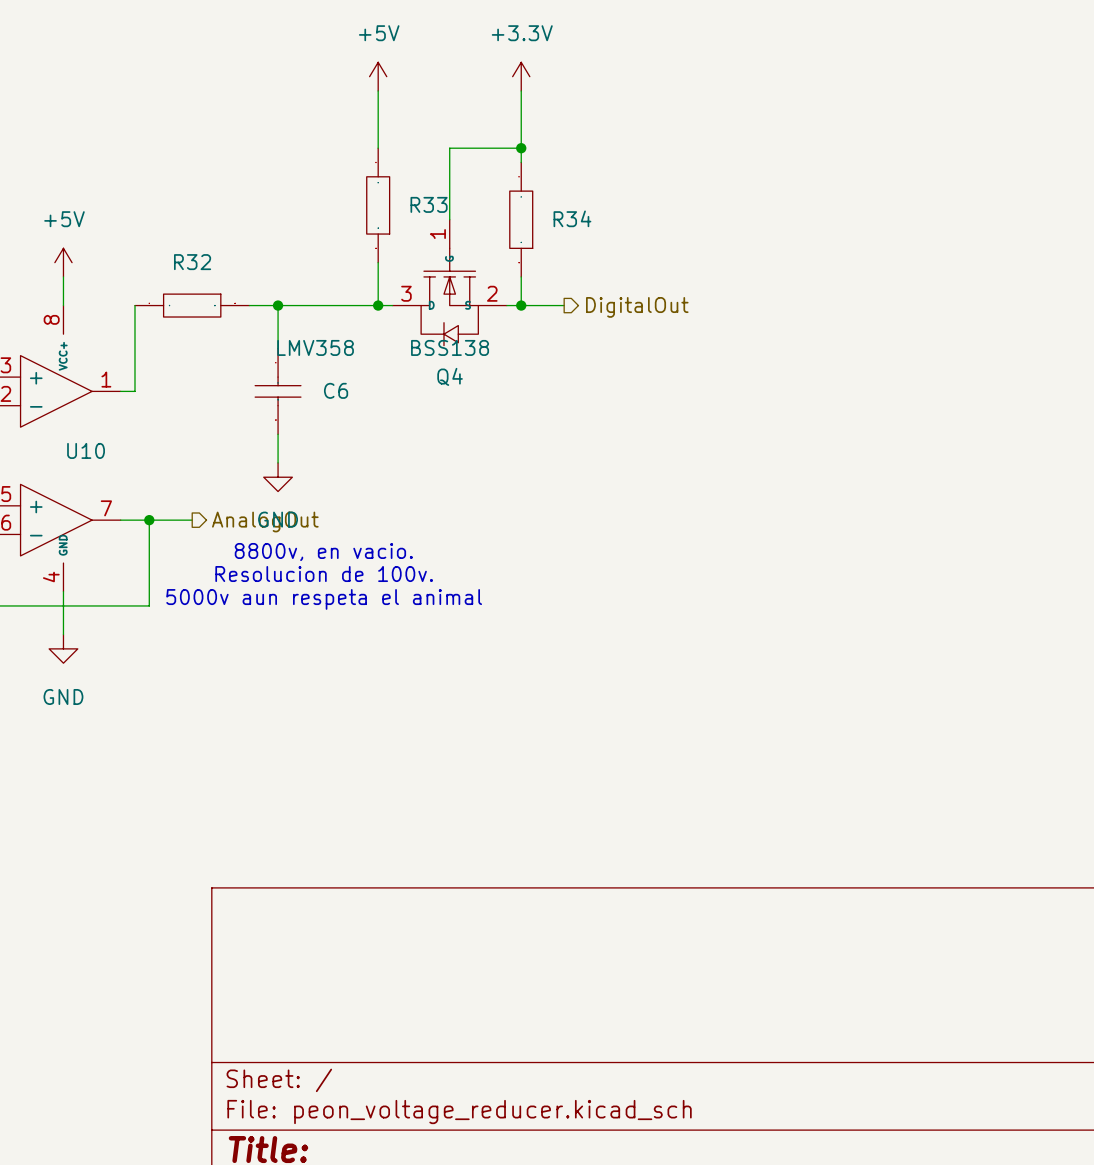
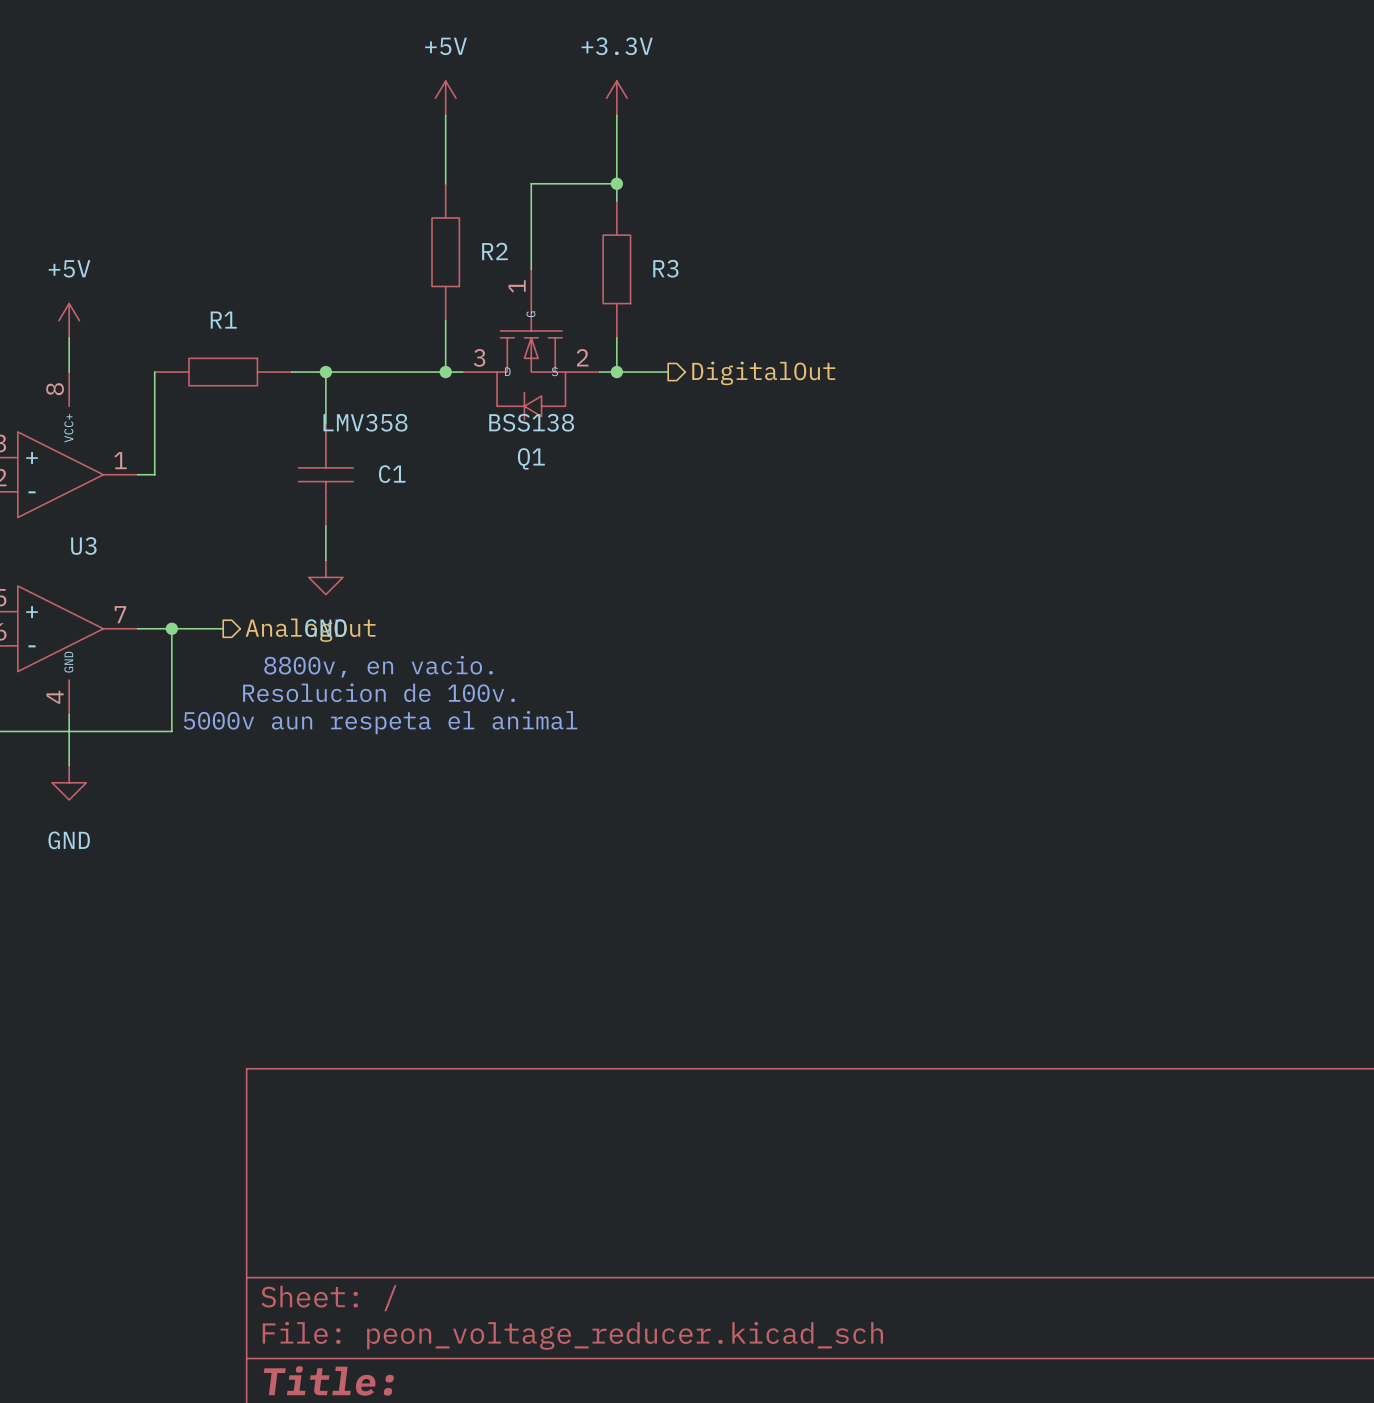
R33 name: R33 (429, 204) -> R2 (494, 251)
R34 name: R34 (572, 218) -> R3 (665, 268)
R32 name: R32 (192, 262) -> R1 (223, 320)
Q4 name: Q4 (450, 376) -> Q1 (531, 458)
C6 name: C6 (336, 390) -> C1 (392, 474)
U10 name: U10 (86, 450) -> U3 (83, 545)

